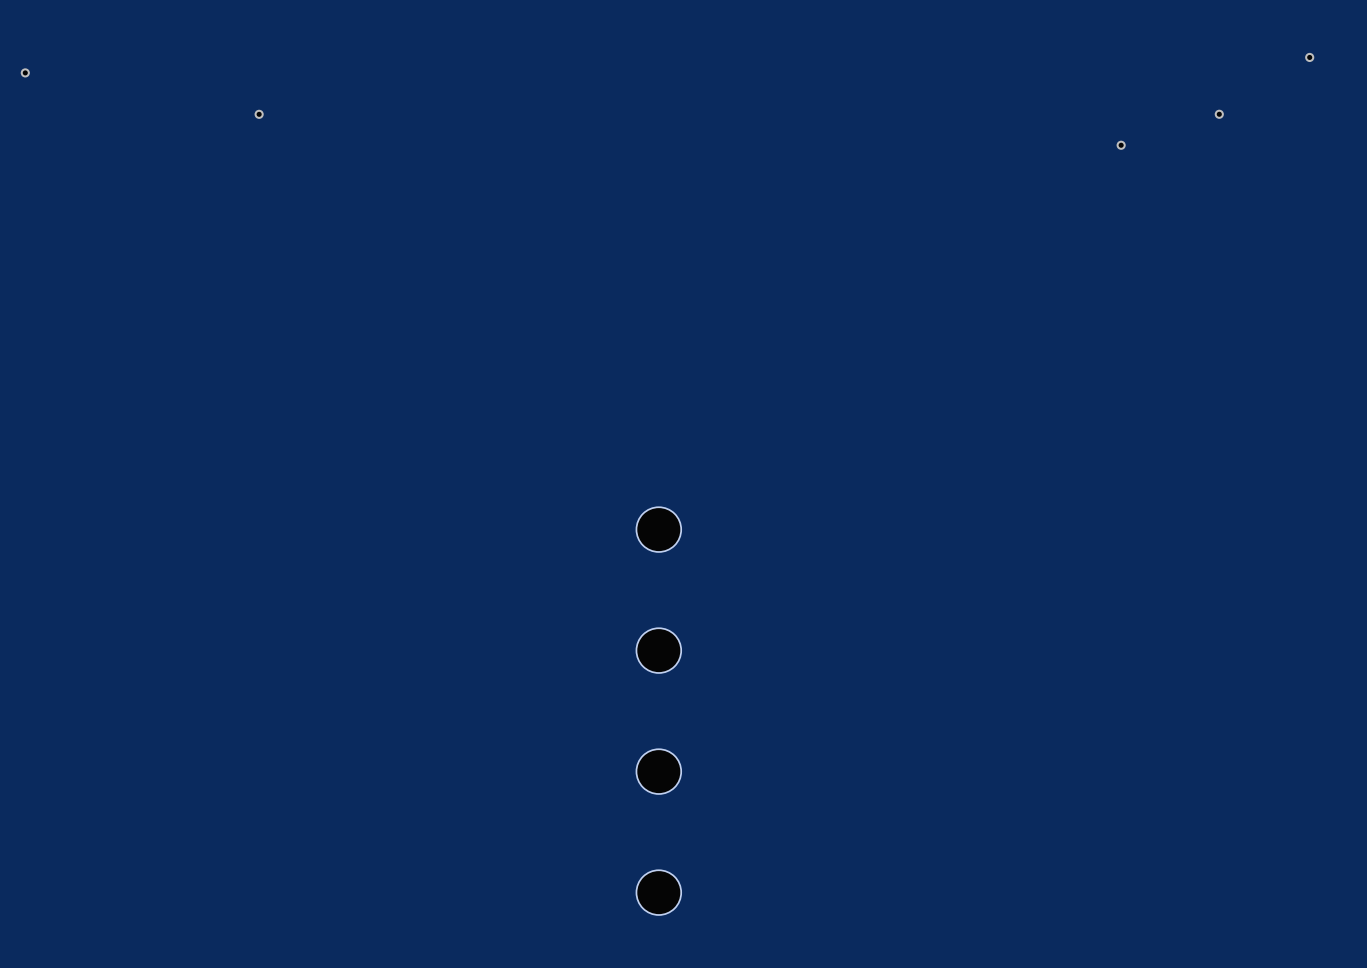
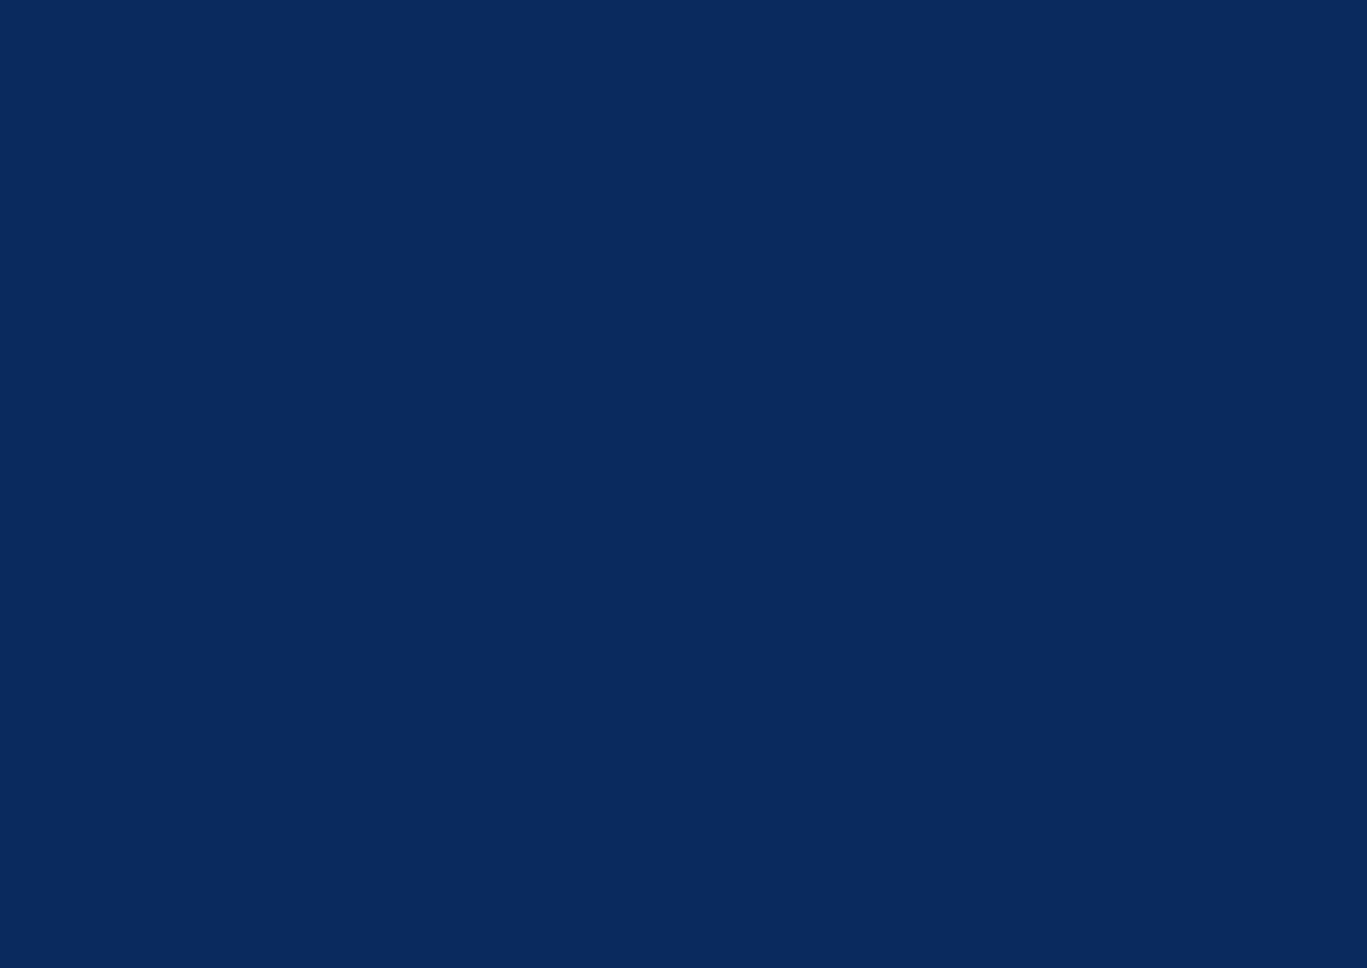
via: (1309, 57) -> none
via: (25, 72) -> none
via: (259, 114) -> none
via: (1219, 114) -> none
via: (1121, 145) -> none
part: (658, 529) -> none
part: (658, 650) -> none
part: (658, 771) -> none
part: (658, 892) -> none

